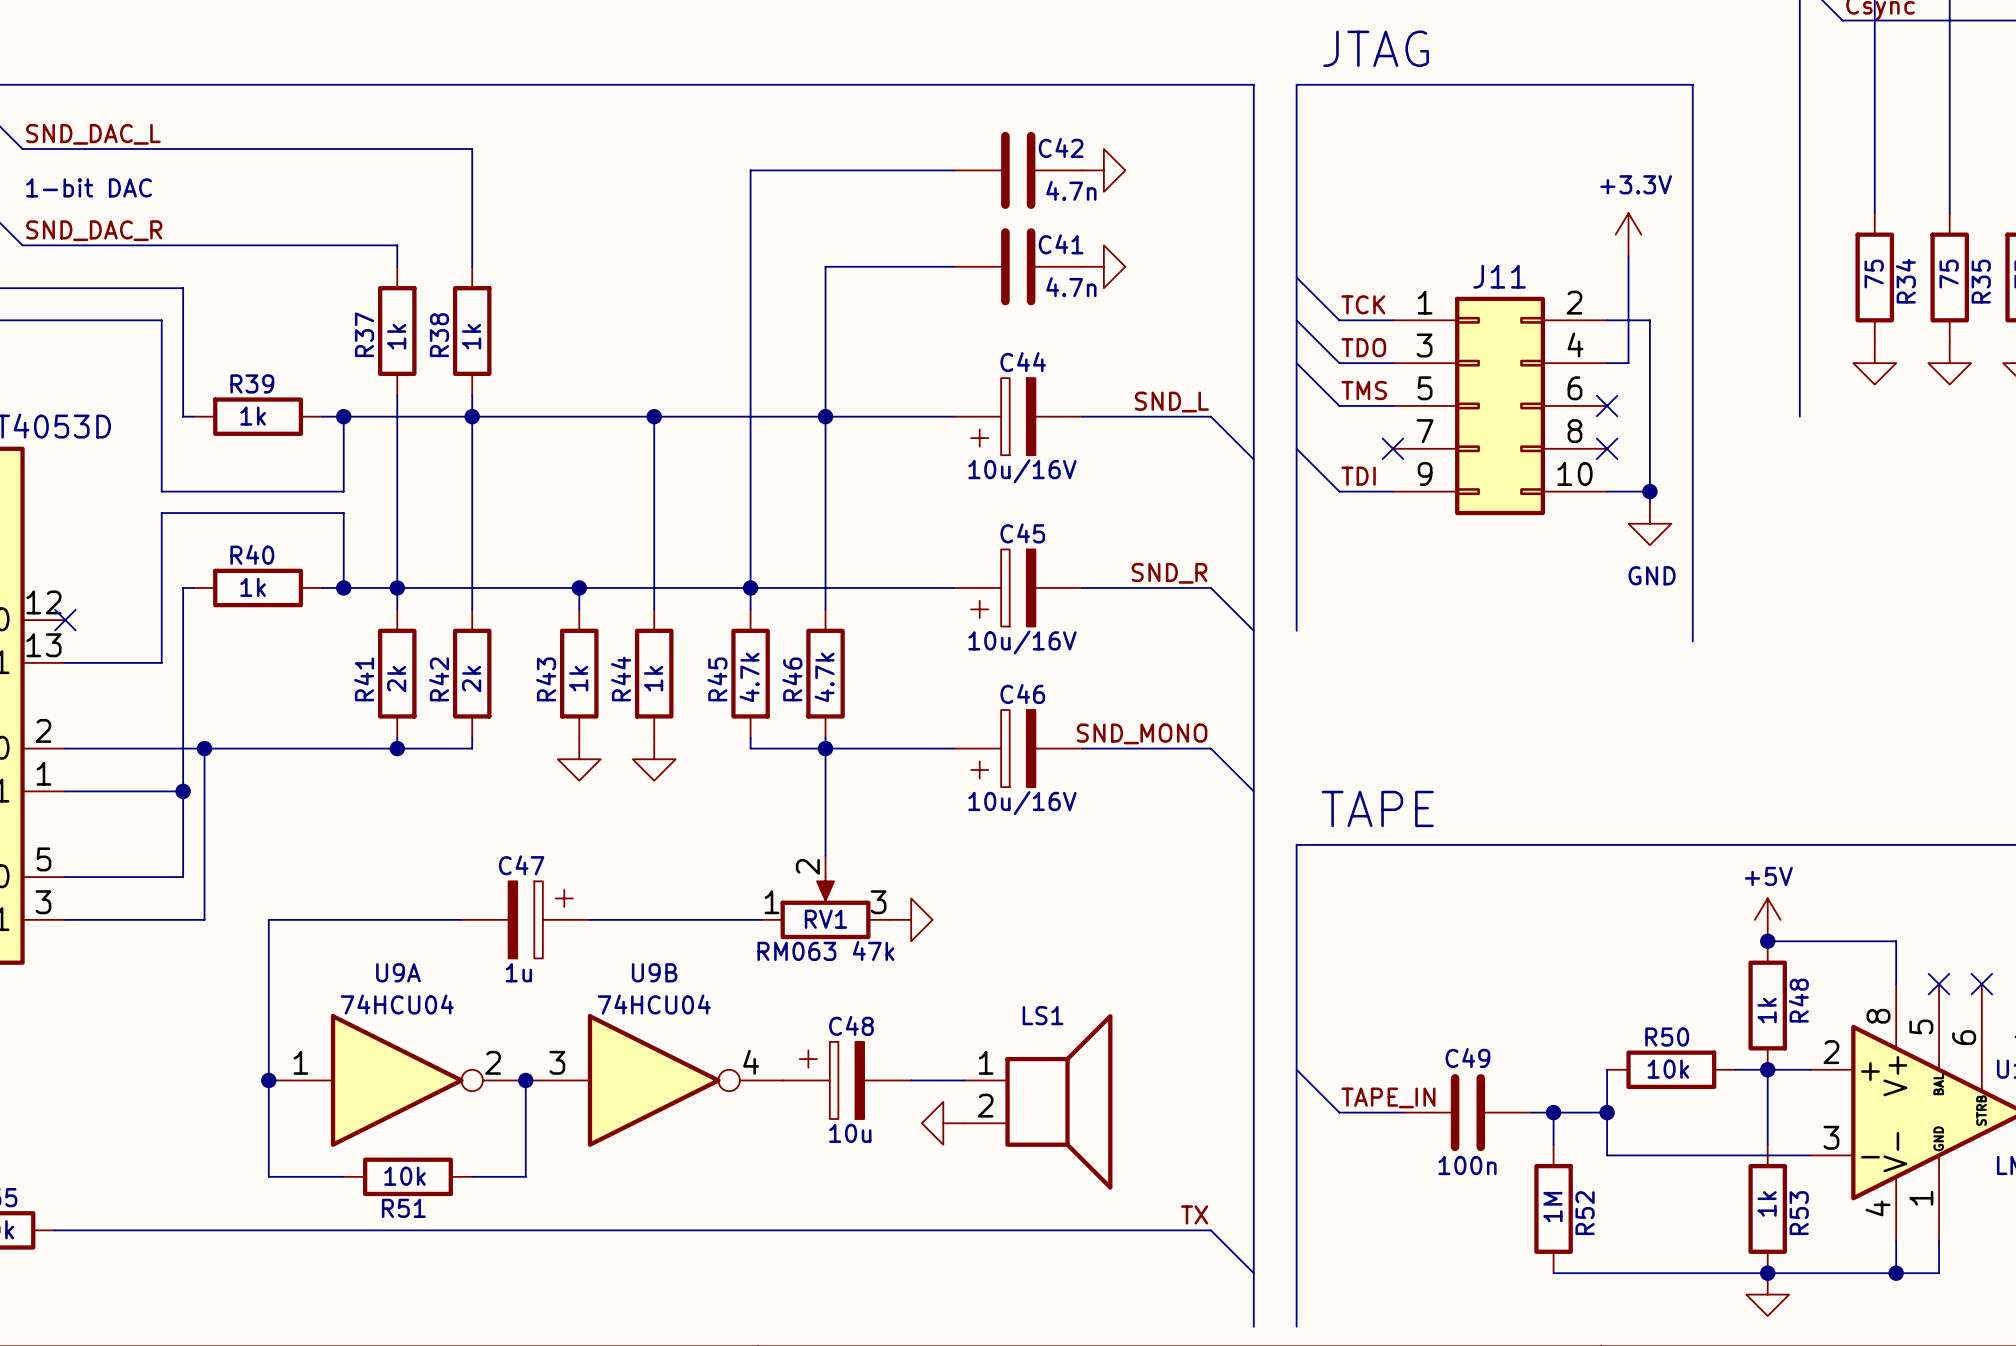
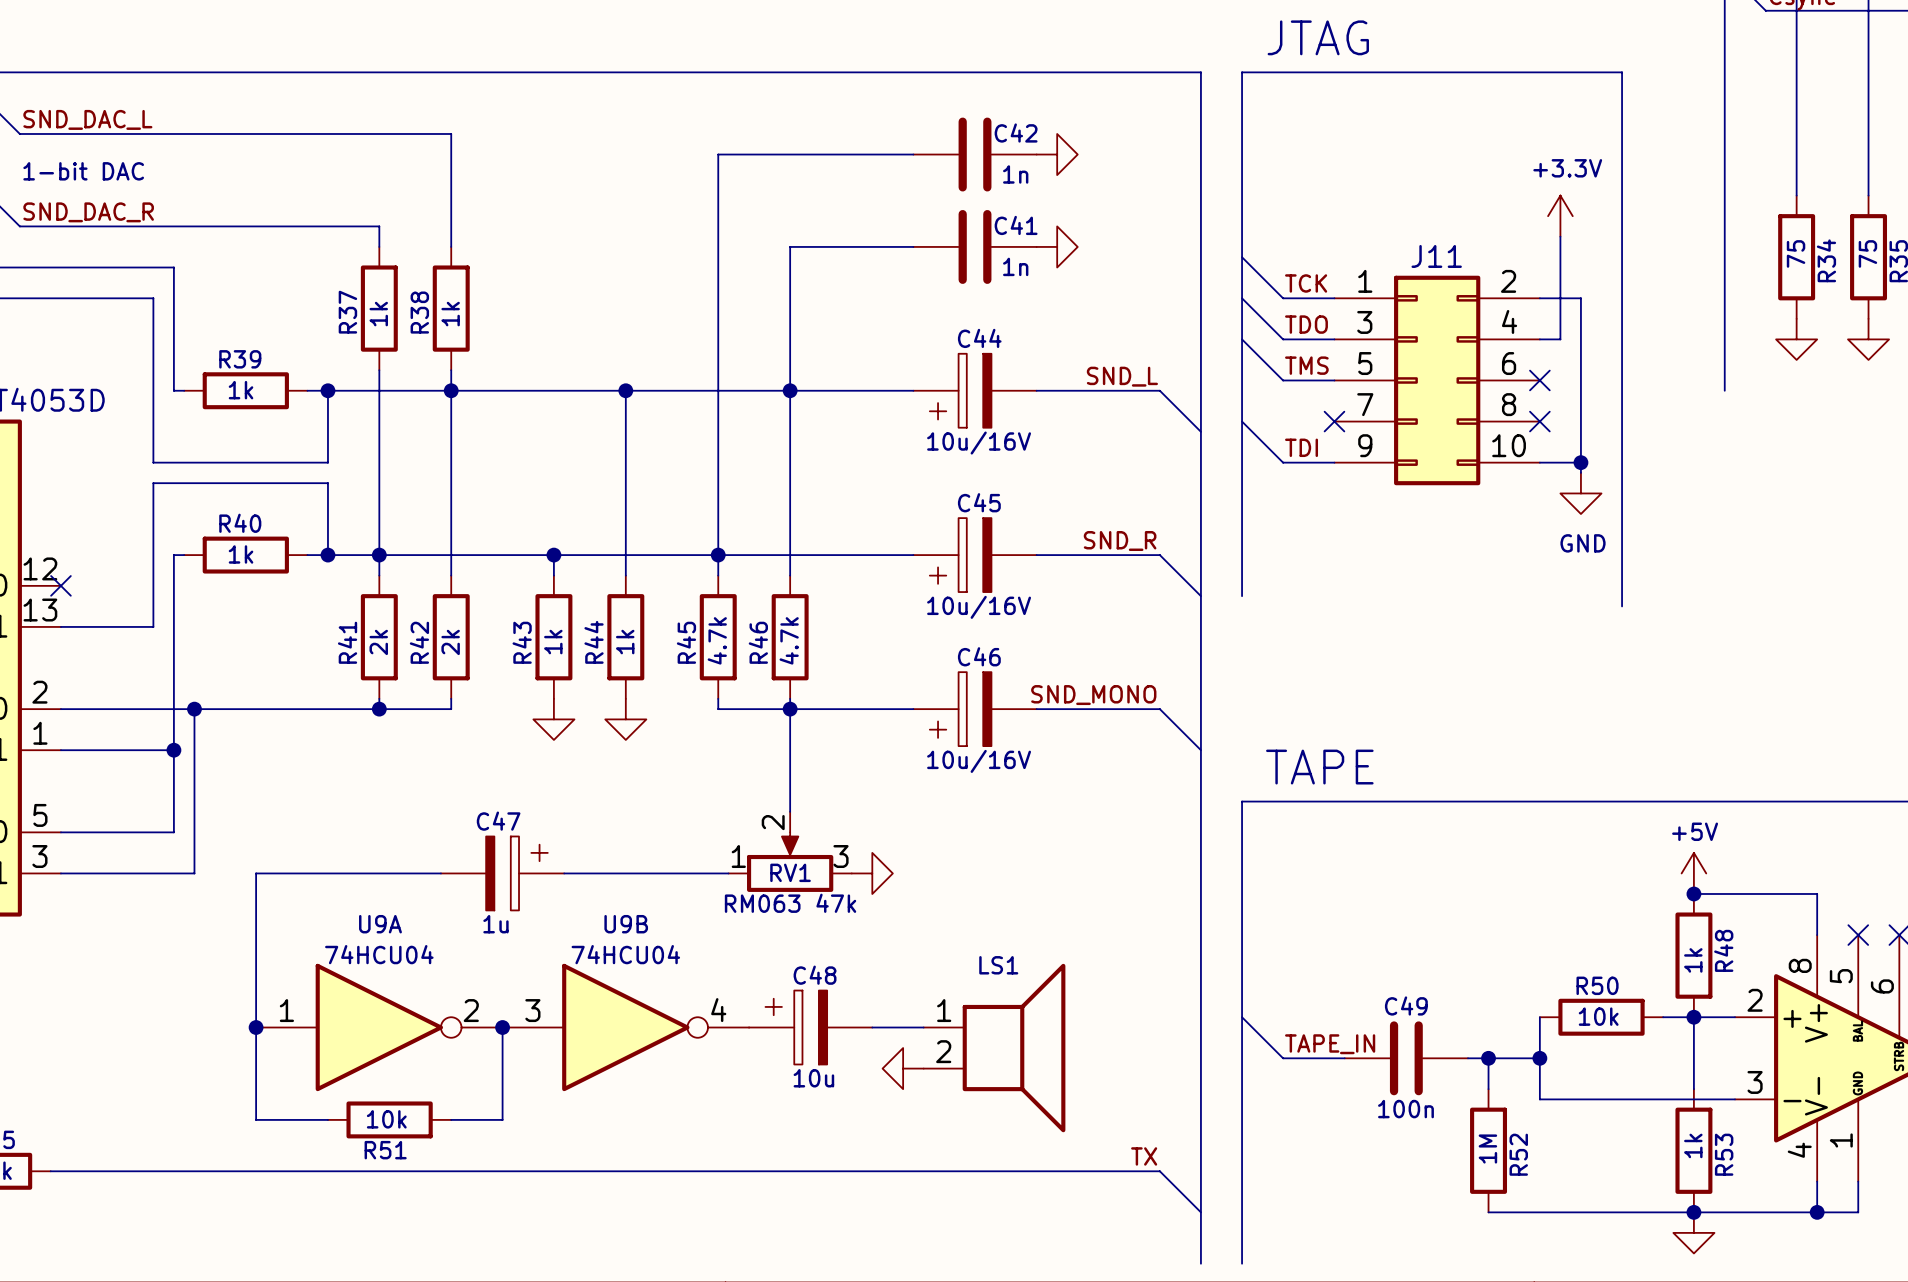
C42 value: 4.7n (1071, 190) -> 1n (1015, 174)
C41 value: 4.7n (1071, 287) -> 1n (1015, 266)

